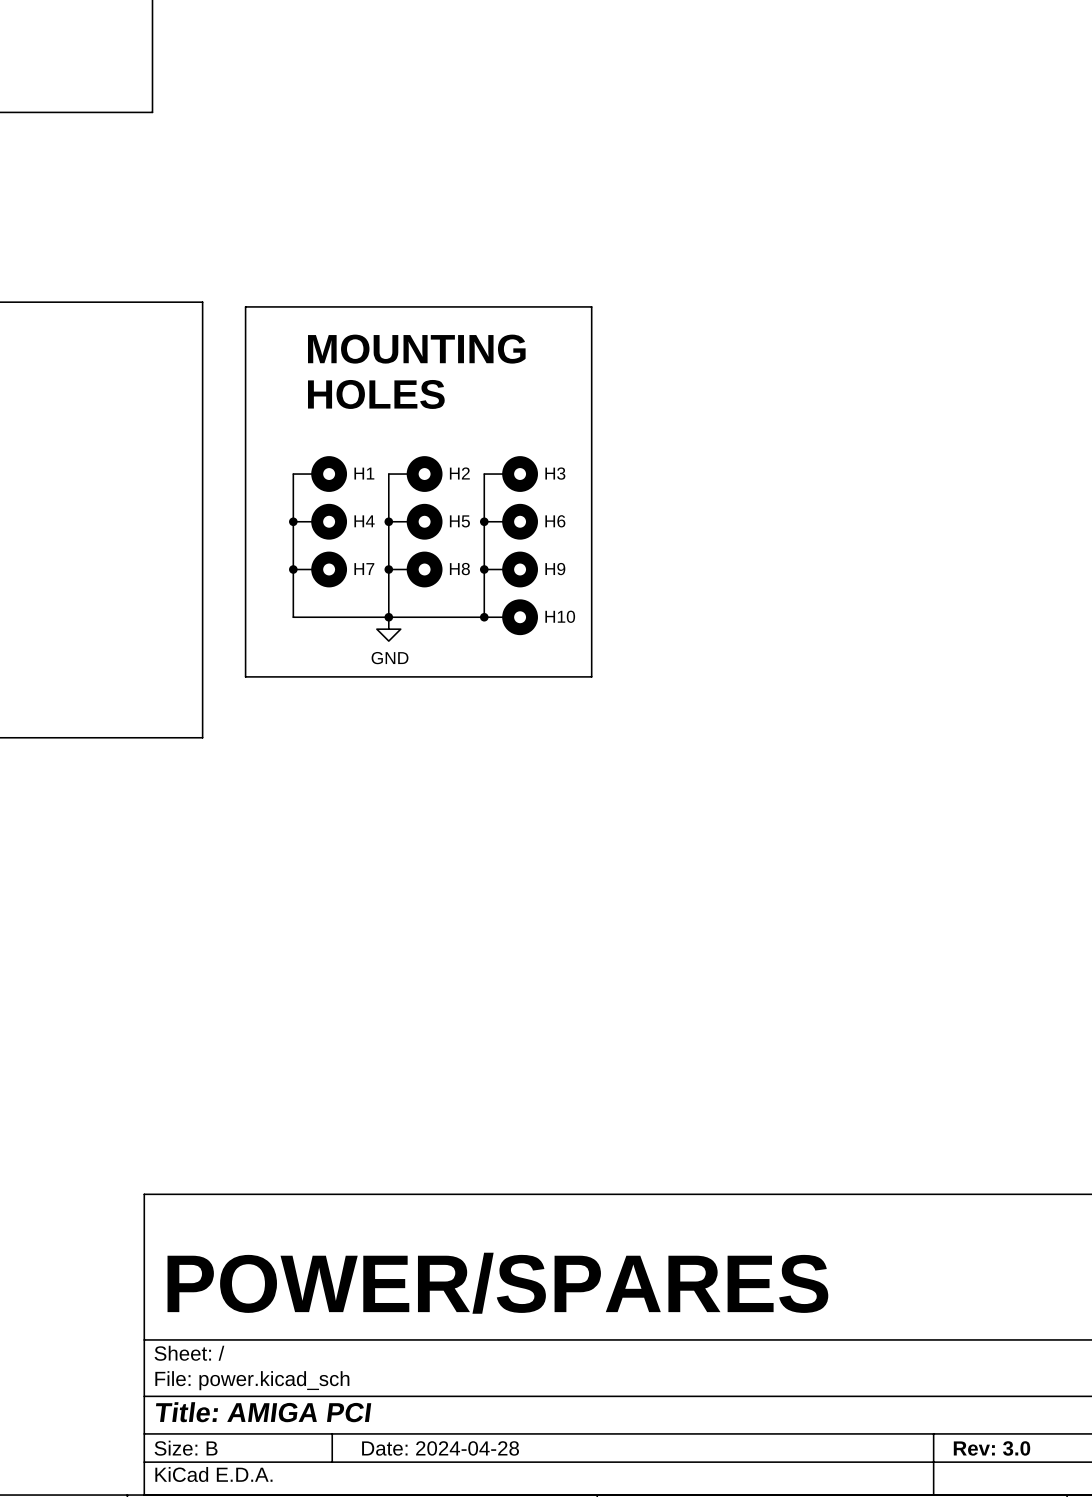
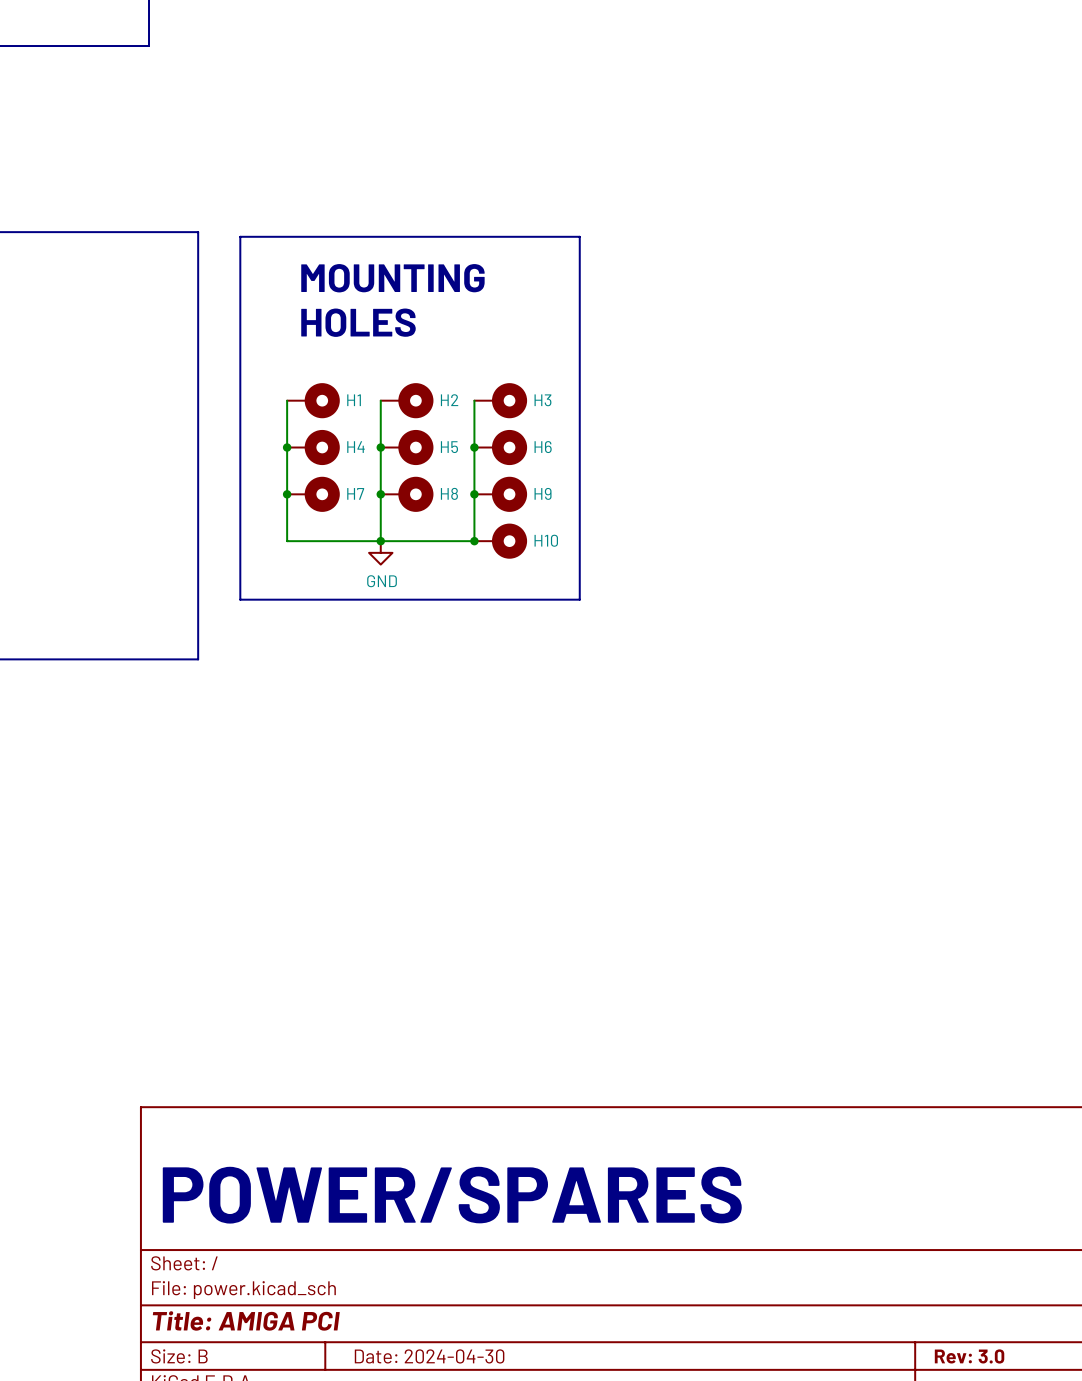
title block: Date: 2024-04-28 (440, 1448) -> Date: 2024-04-30 (429, 1356)

